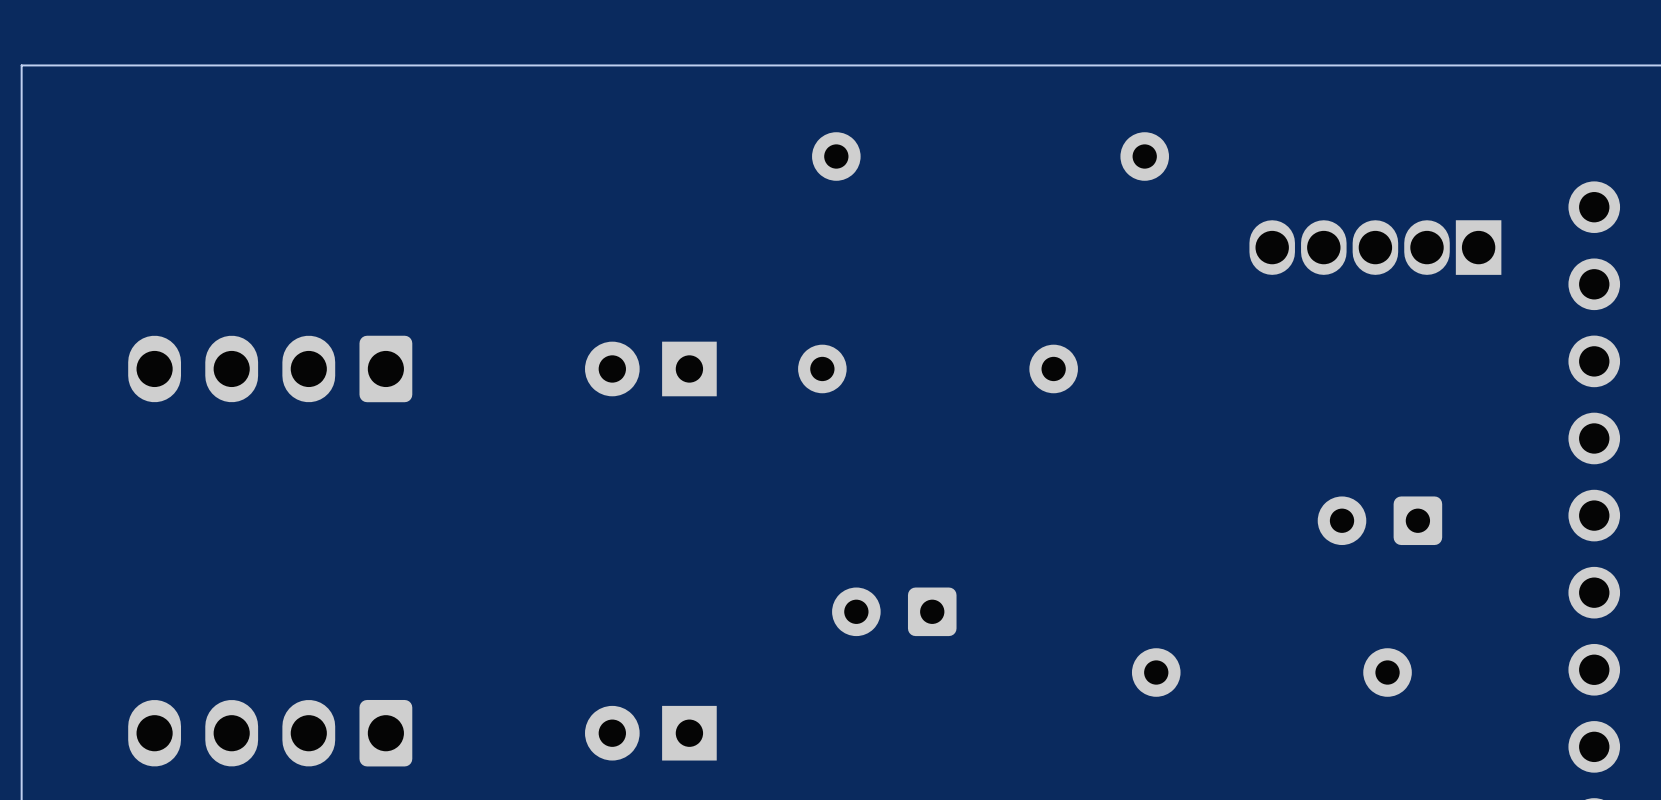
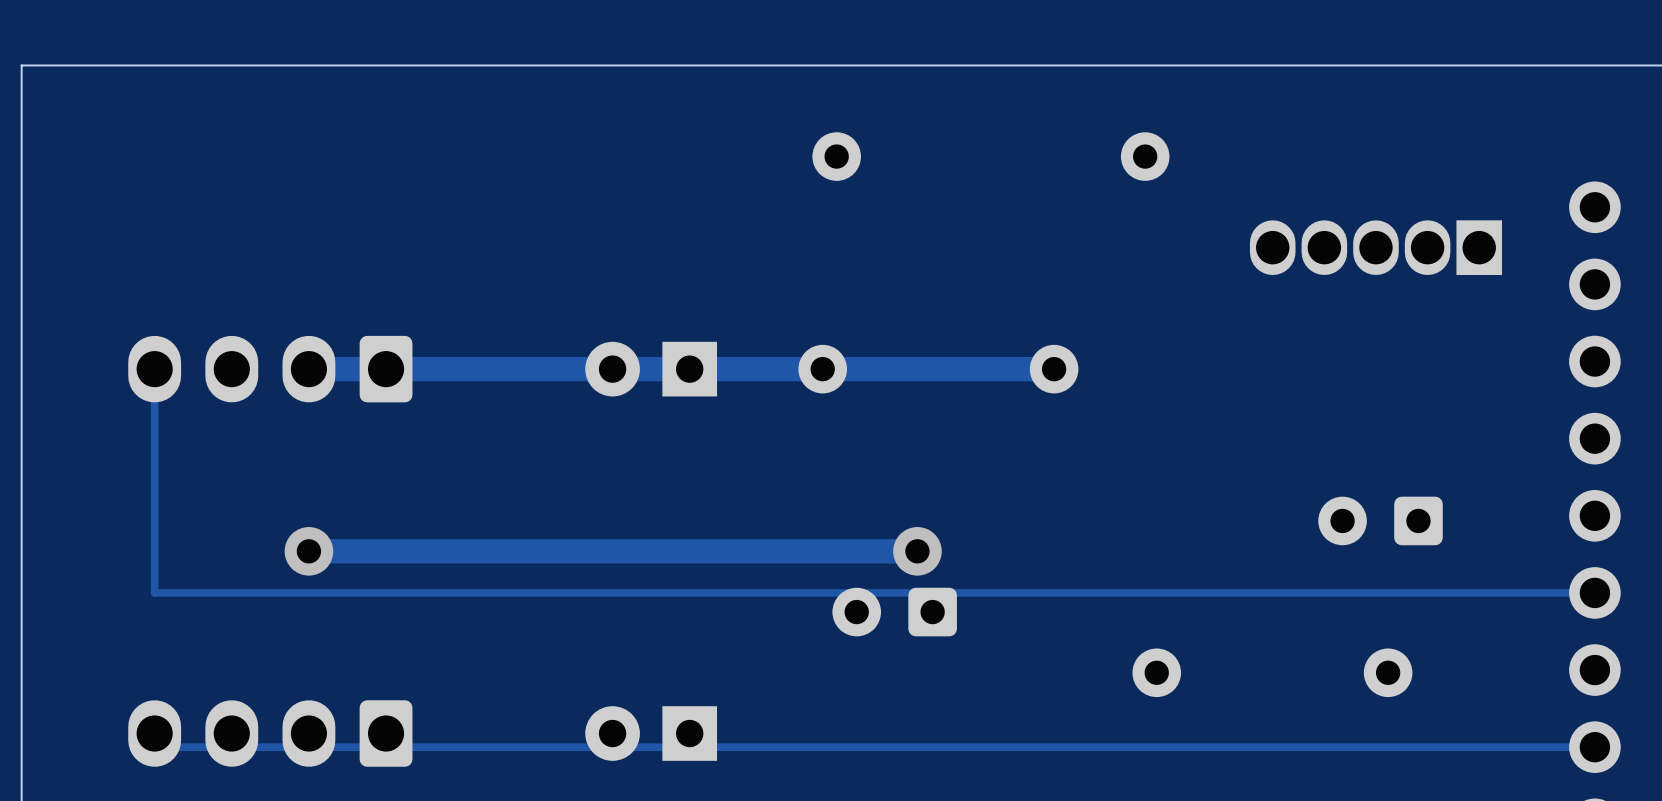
track: none -> (154, 369) (154, 592) (1594, 592)
track: none -> (1054, 369) (308, 369)
via: none -> (308, 551)
track: none -> (917, 551) (308, 551)
via: none -> (917, 551)
track: none -> (154, 733) (154, 747) (1594, 747)

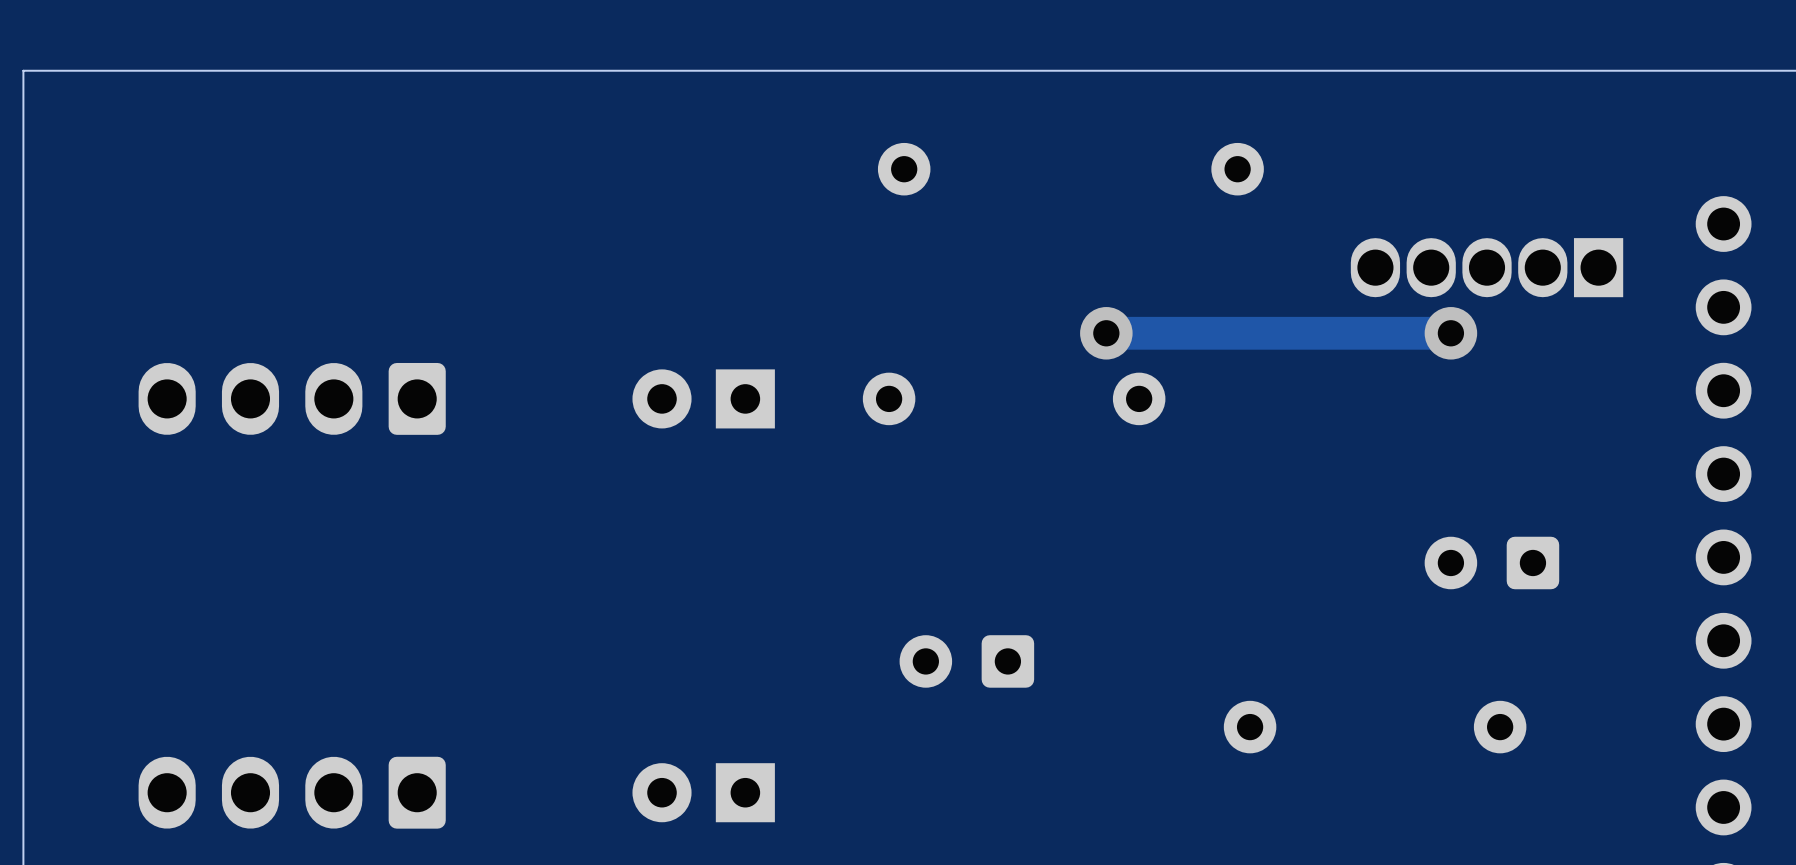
via: none -> (1106, 333)
track: none -> (1450, 333) (1106, 333)
via: none -> (1450, 333)
track: (154, 369) (154, 592) (1594, 592) -> none
track: (1054, 369) (308, 369) -> none
via: (308, 551) -> none
track: (917, 551) (308, 551) -> none
via: (917, 551) -> none
track: (154, 733) (154, 747) (1594, 747) -> none

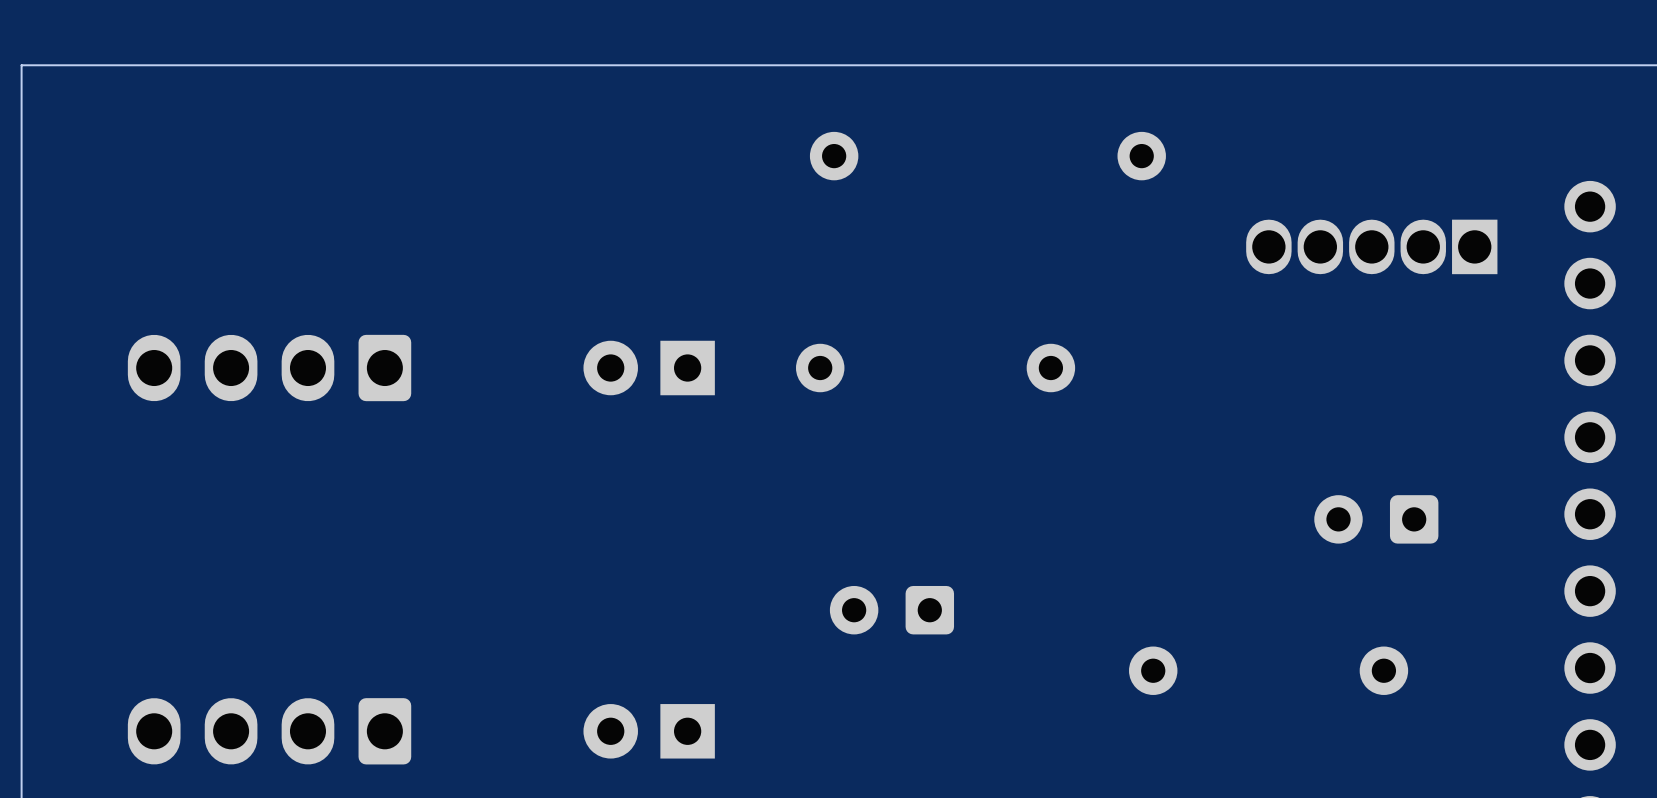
via: (1106, 333) -> none
track: (1450, 333) (1106, 333) -> none
via: (1450, 333) -> none

